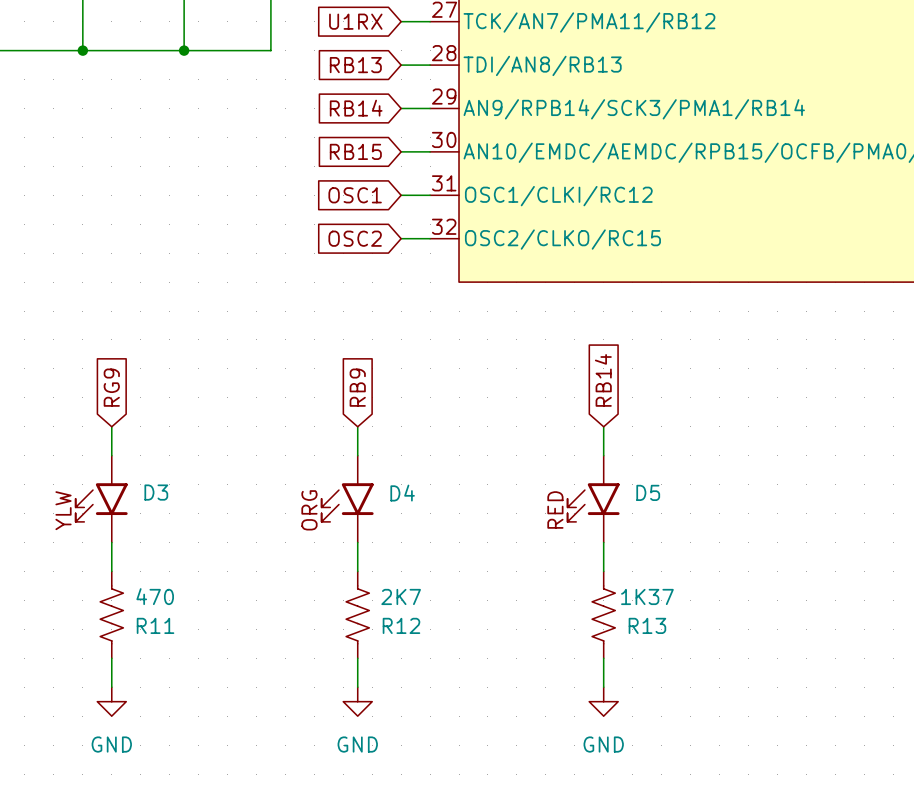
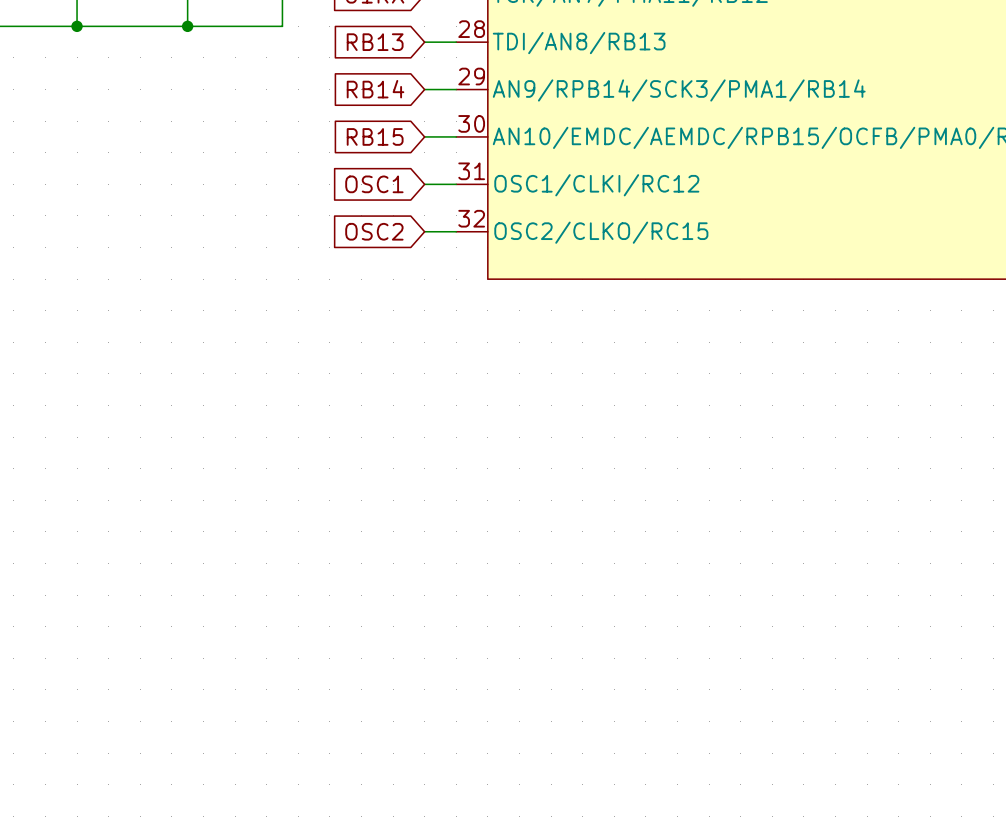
global label: RB14 (603, 380) -> none
global label: RG9 (111, 387) -> none
global label: RB9 (357, 387) -> none
wire: (111, 426) (111, 455) -> none
wire: (357, 426) (357, 455) -> none
wire: (603, 426) (603, 455) -> none
D3: (101, 499) -> none
D4: (347, 499) -> none
D5: (593, 499) -> none
wire: (111, 542) (111, 571) -> none
wire: (357, 542) (357, 571) -> none
wire: (603, 542) (603, 571) -> none
R11: 470 (111, 614) -> none
R12: 2K7 (357, 614) -> none
R13: 1K37 (603, 614) -> none
wire: (111, 658) (111, 687) -> none
wire: (357, 658) (357, 687) -> none
wire: (603, 658) (603, 687) -> none
power symbol: GND (111, 701) -> none
power symbol: GND (357, 701) -> none
power symbol: GND (603, 701) -> none

